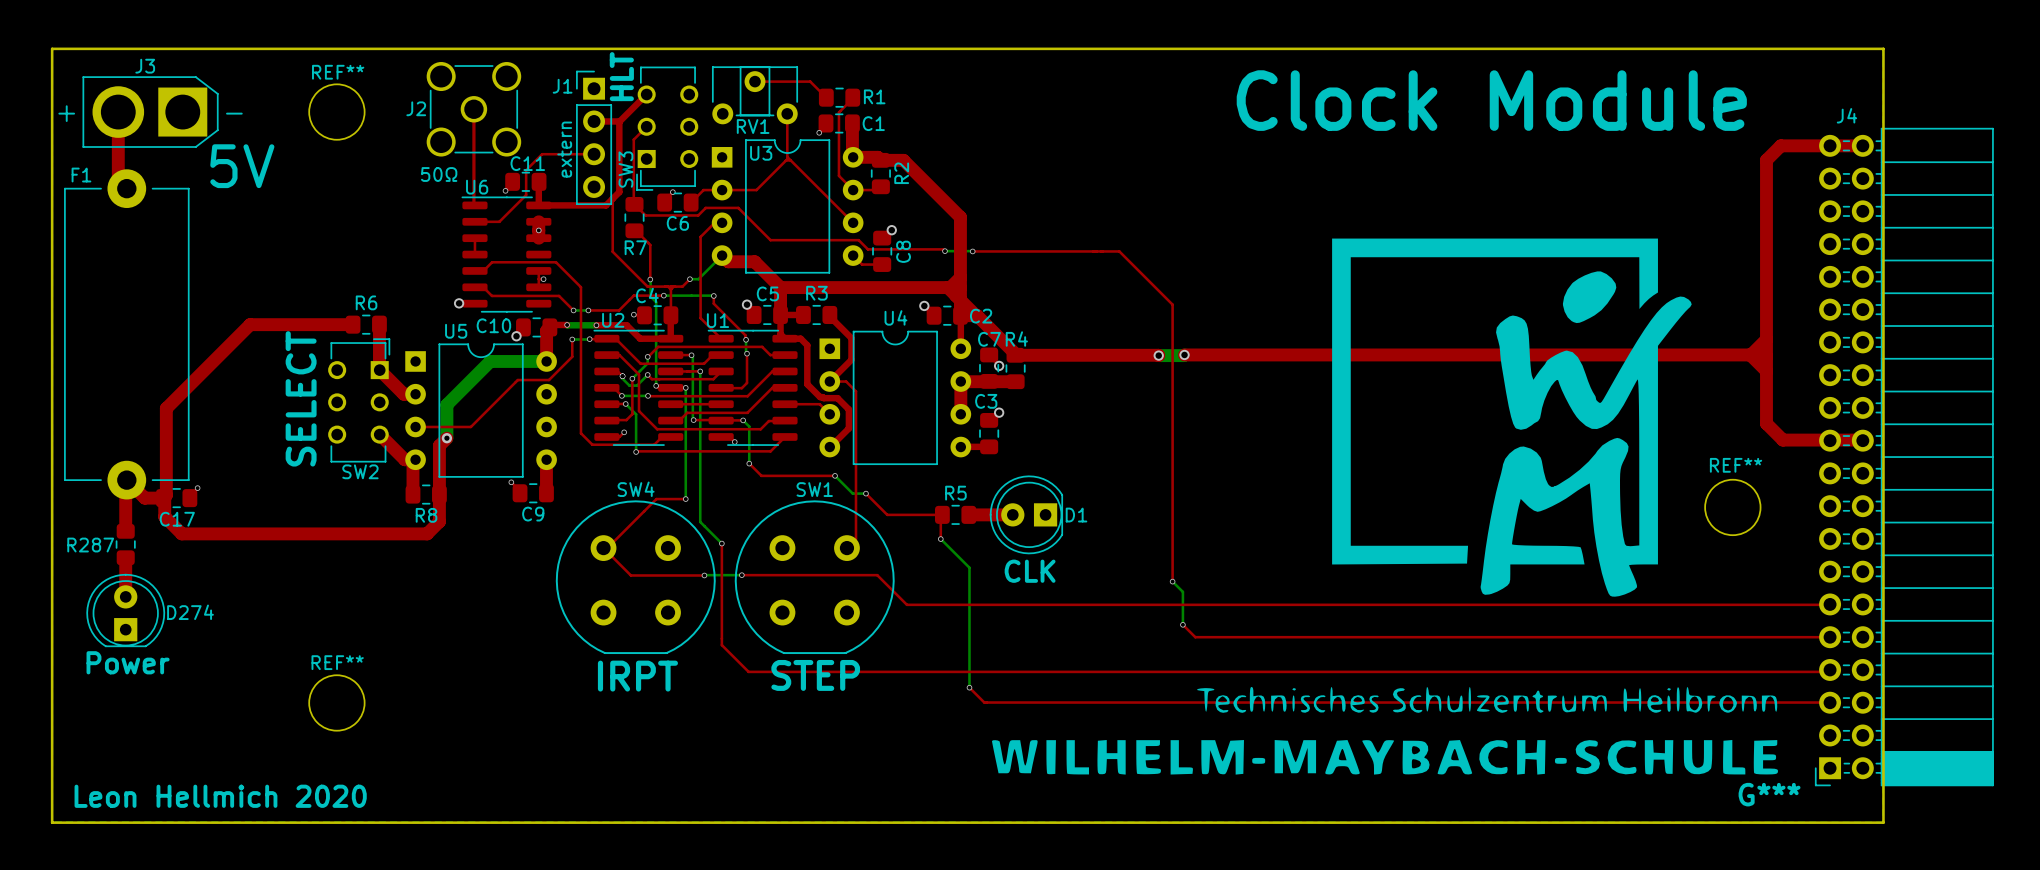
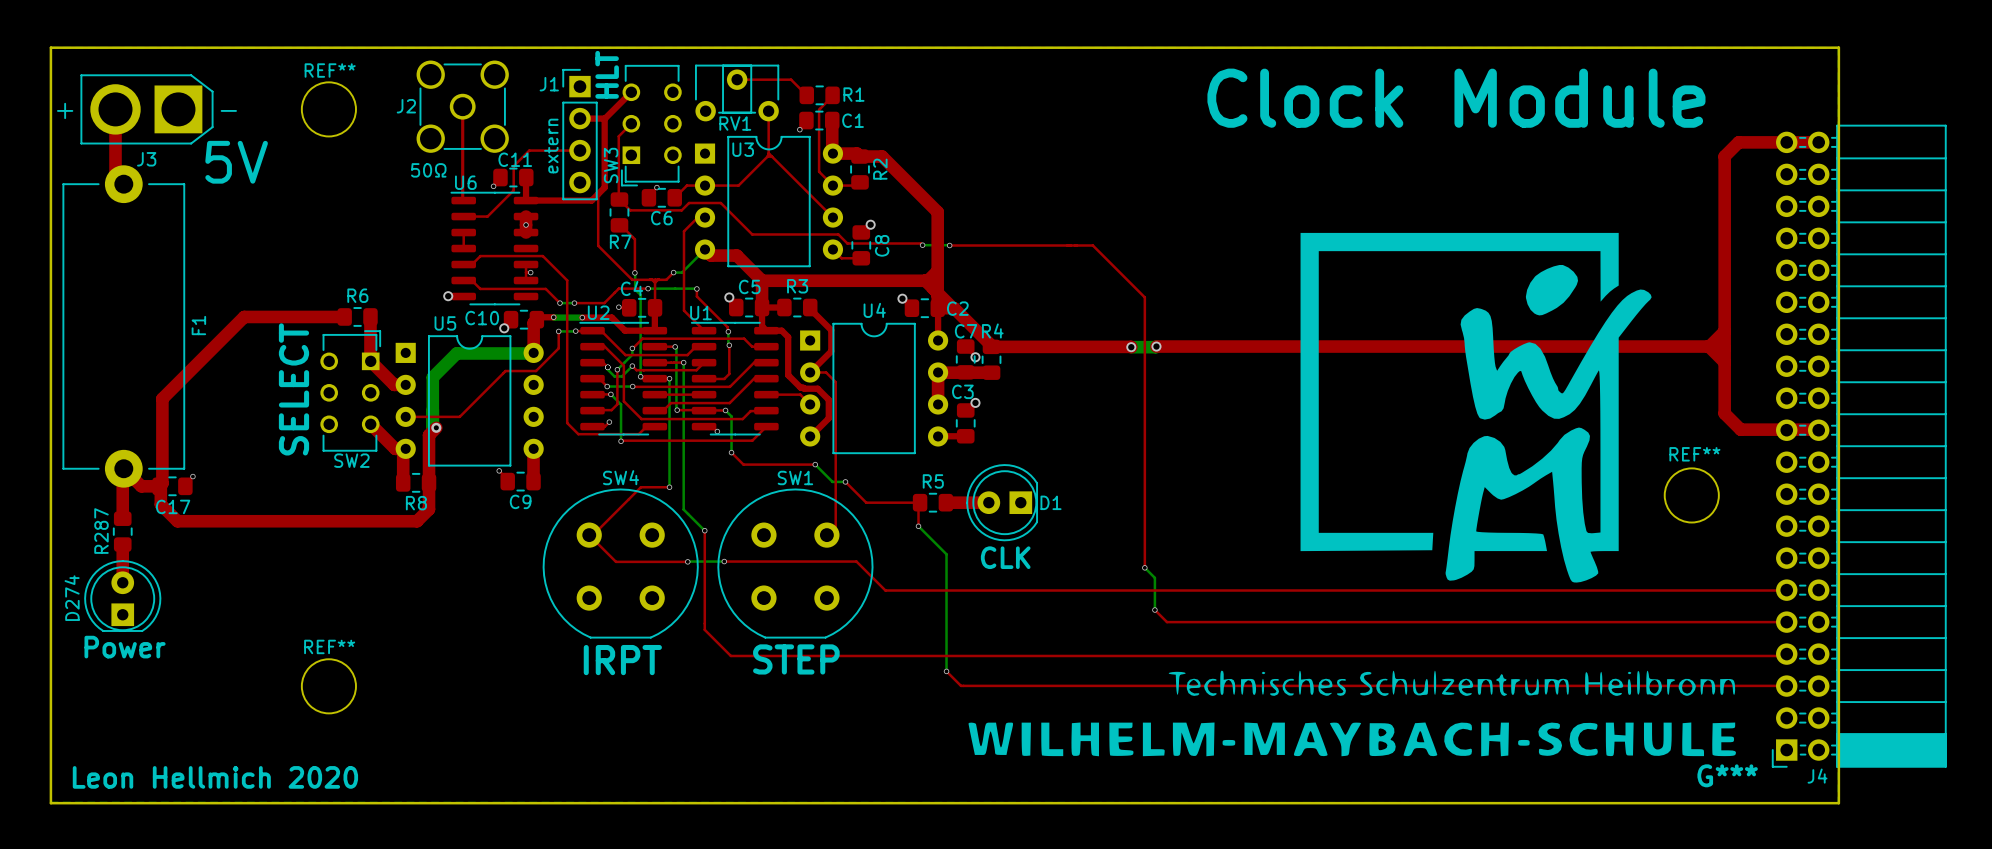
J3 name position: J3 (145, 66) -> J3 (146, 159)
J4 name position: J4 (1846, 115) -> J4 (1817, 776)
F1 name rotation: 0° (81, 175) -> 90° counterclockwise (198, 325)
F1 name position: F1 (81, 175) -> F1 (198, 325)
bottom track: (546, 361) (490, 361) (446, 404) (446, 438) -> none
bottom track: none -> (533, 353) (456, 353) (432, 377) (432, 428)
R287 name rotation: 0° (90, 545) -> 90° counterclockwise (101, 531)
D274 name rotation: 0° (190, 612) -> 90° counterclockwise (72, 598)
D274 name position: D274 (190, 612) -> D274 (72, 598)

